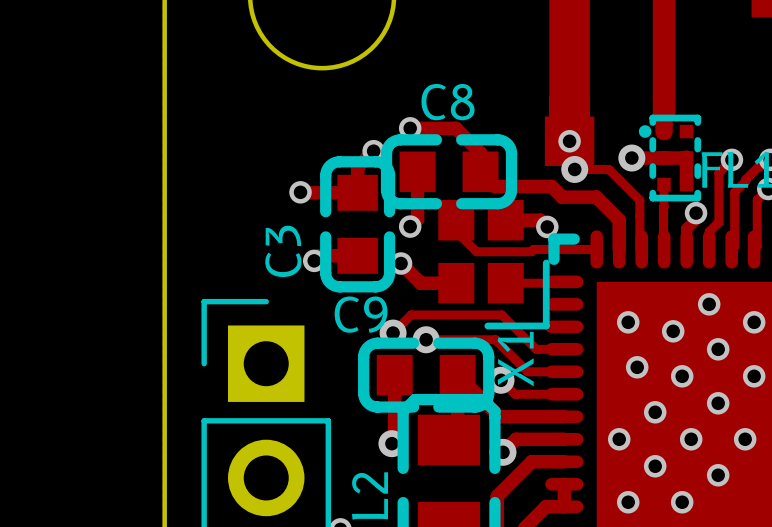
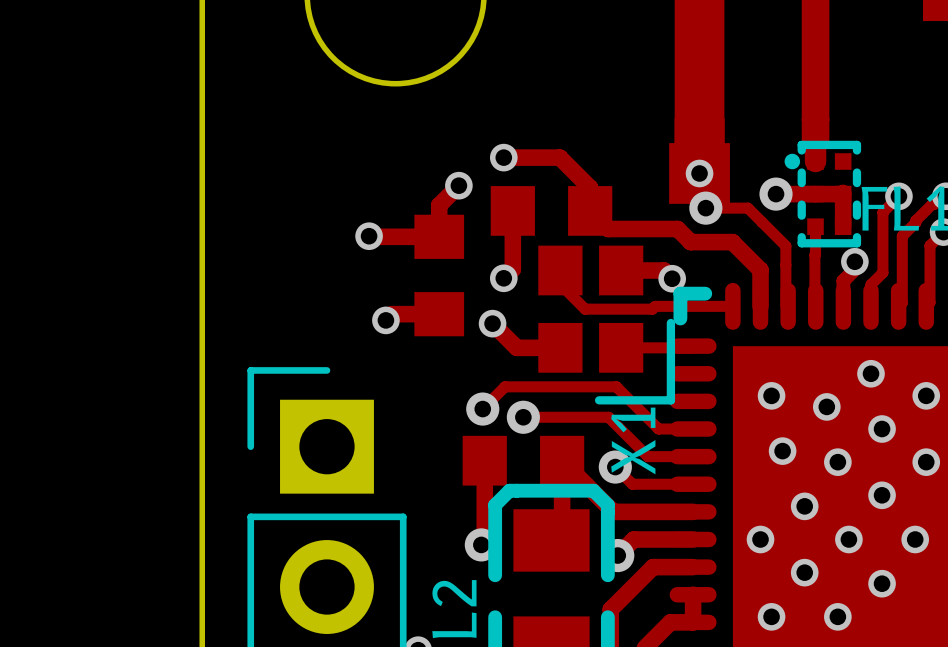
C8: (449, 171) -> none
C3: (357, 224) -> none
C9: (426, 375) -> none

